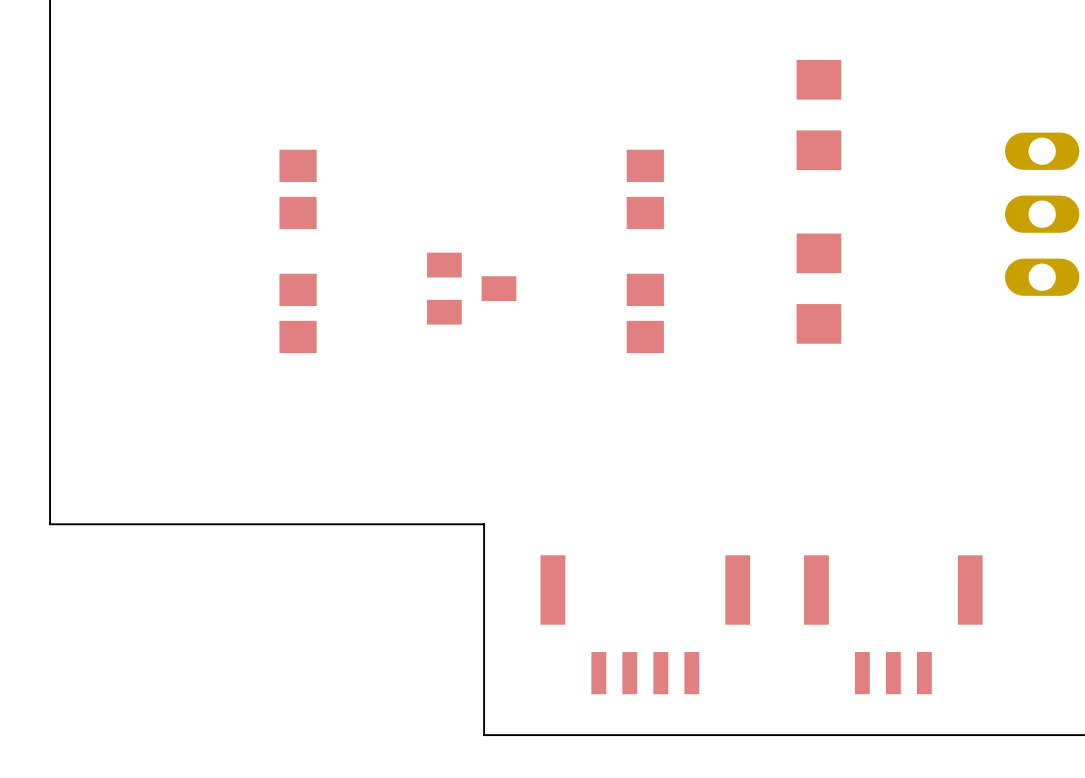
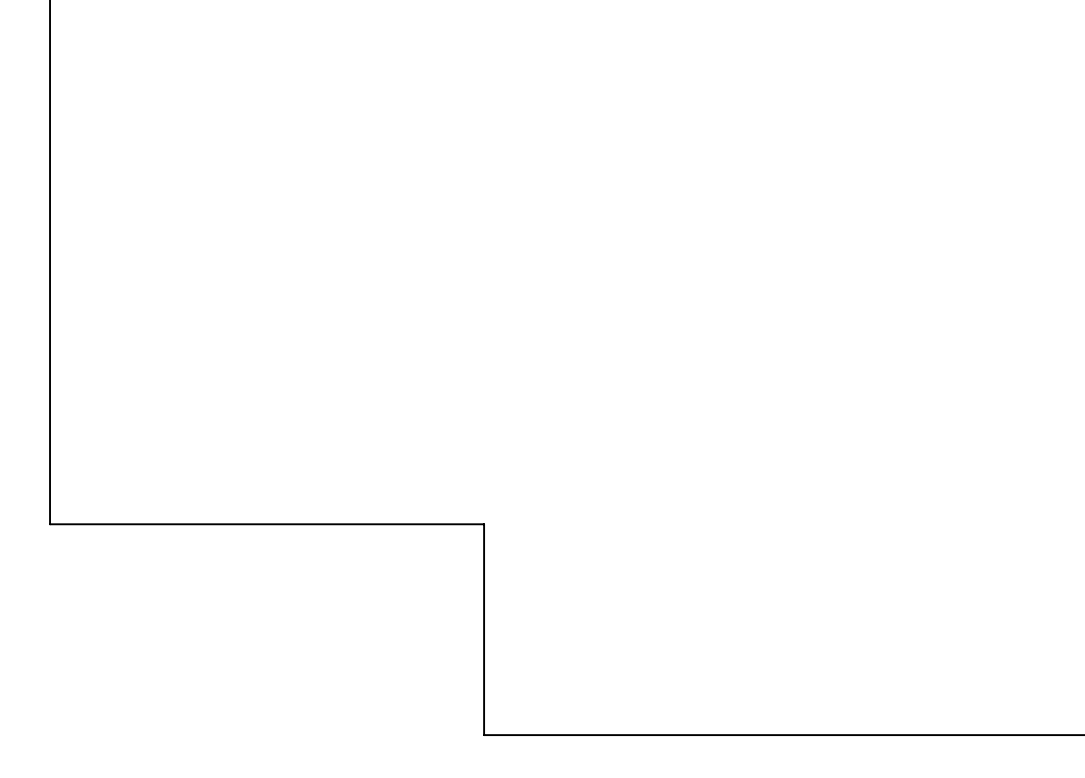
part: (818, 115) -> none
part: (298, 189) -> none
part: (645, 189) -> none
part: (1042, 214) -> none
part: (471, 288) -> none
part: (818, 288) -> none
part: (298, 313) -> none
part: (645, 313) -> none
part: (645, 624) -> none
part: (893, 624) -> none

